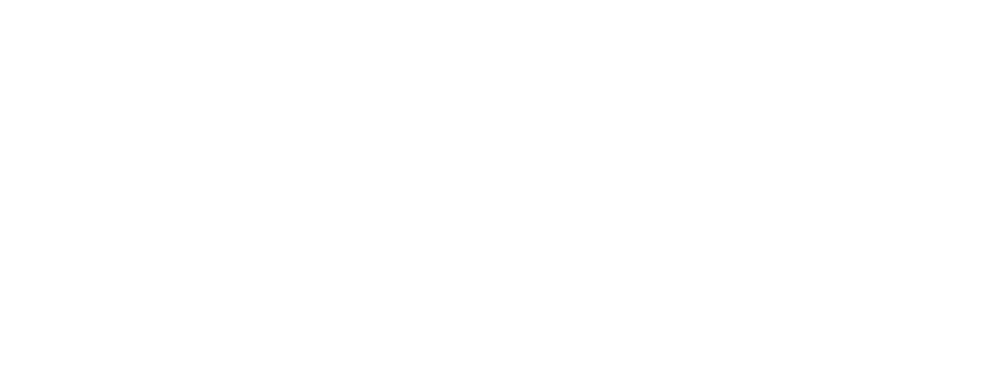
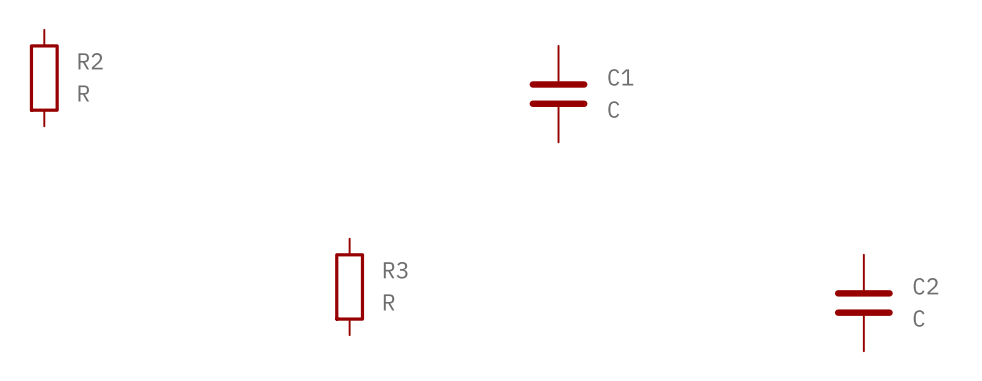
R2: none -> R (44, 78)
C1: none -> C (558, 94)
R3: none -> R (349, 286)
C2: none -> C (863, 303)

